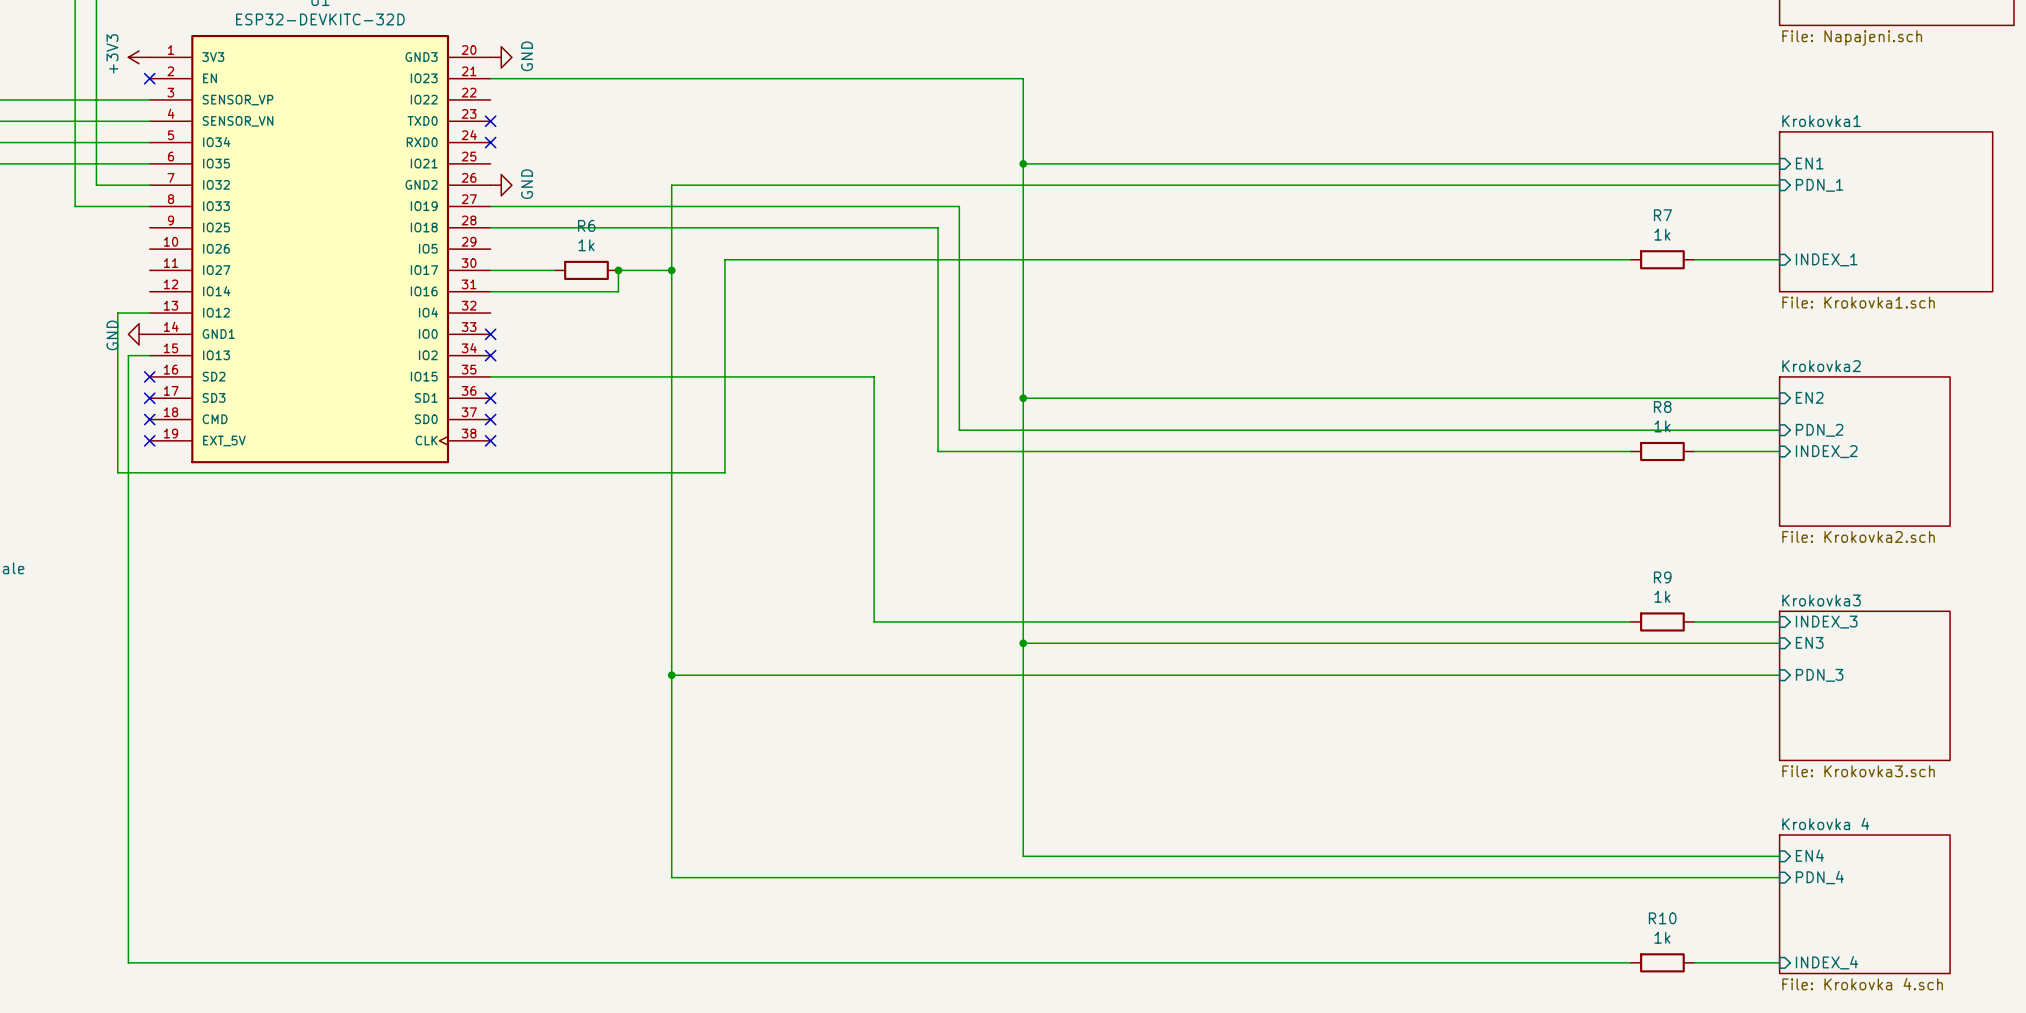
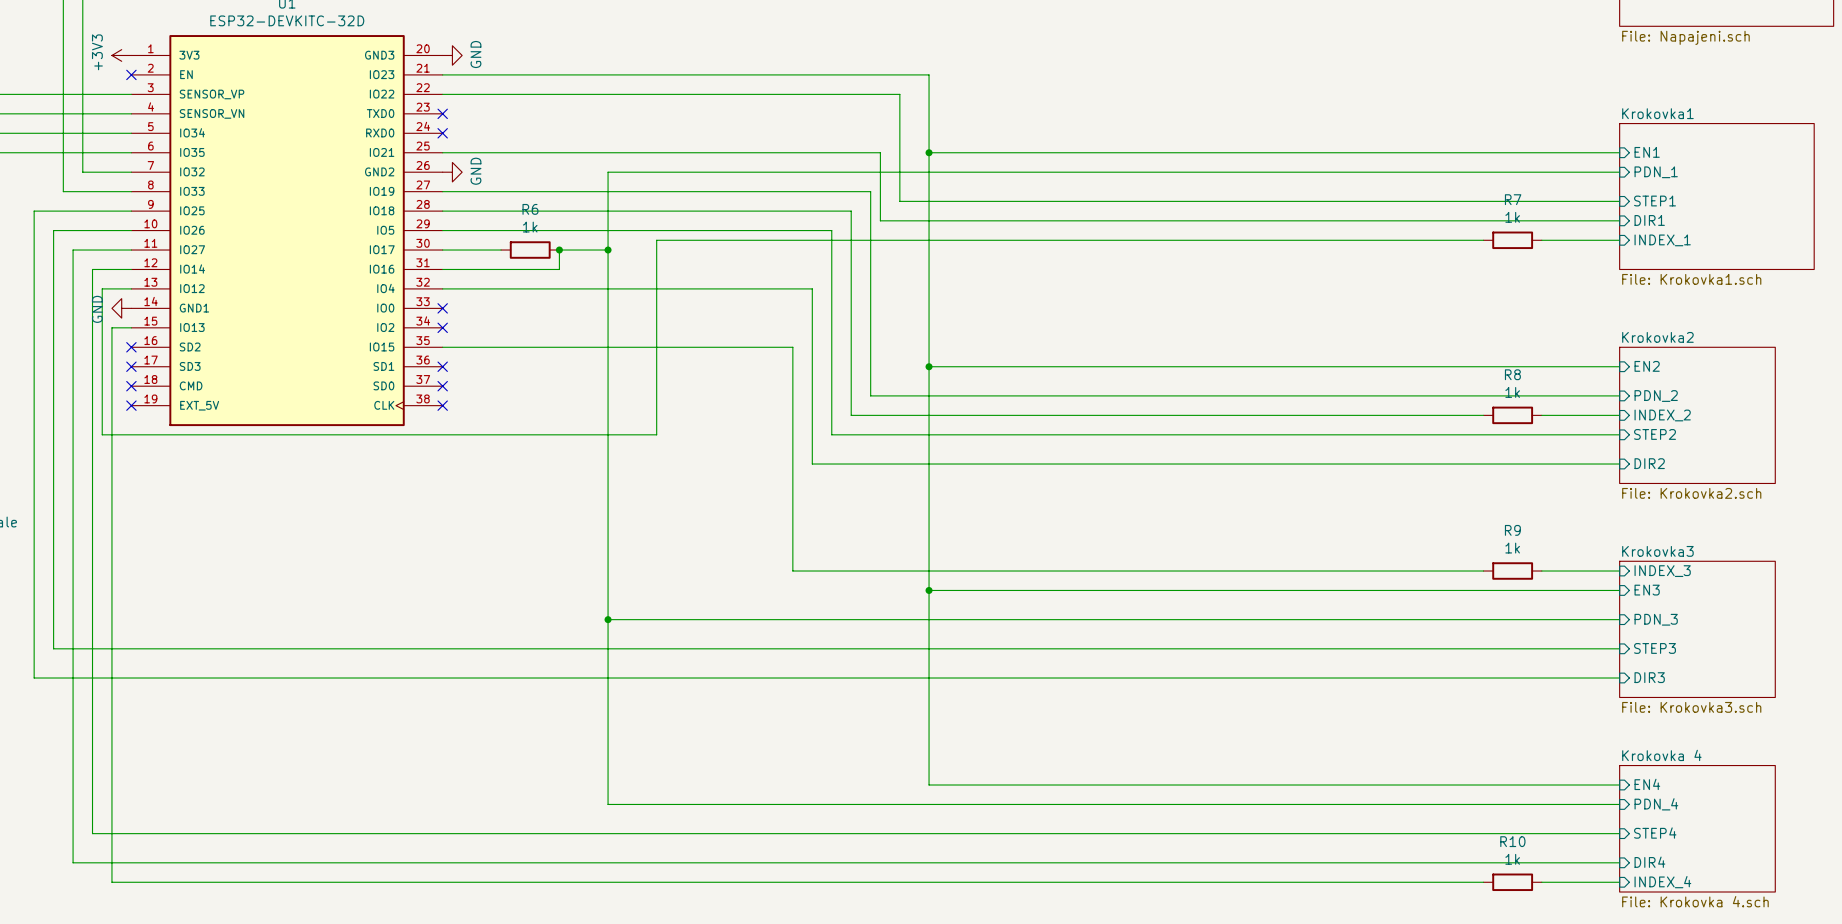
wire: none -> (442, 94) (899, 94) (899, 201) (1619, 201)
wire: none -> (442, 152) (880, 152) (880, 220) (1619, 220)
sheet pin: none -> STEP1 (1655, 201)
wire: none -> (131, 211) (34, 211) (34, 678) (1619, 678)
sheet pin: none -> DIR1 (1649, 220)
wire: none -> (131, 230) (53, 230) (53, 648) (1619, 648)
wire: none -> (442, 230) (831, 230) (831, 434) (1619, 434)
wire: none -> (131, 250) (73, 250) (73, 862) (1619, 862)
wire: none -> (131, 269) (92, 269) (92, 833) (1619, 833)
wire: none -> (442, 288) (812, 288) (812, 464) (1619, 464)
sheet pin: none -> STEP2 (1655, 434)
sheet pin: none -> DIR2 (1649, 463)
sheet pin: none -> STEP3 (1655, 648)
sheet pin: none -> DIR3 (1649, 677)
sheet pin: none -> STEP4 (1655, 833)
sheet pin: none -> DIR4 (1649, 862)

